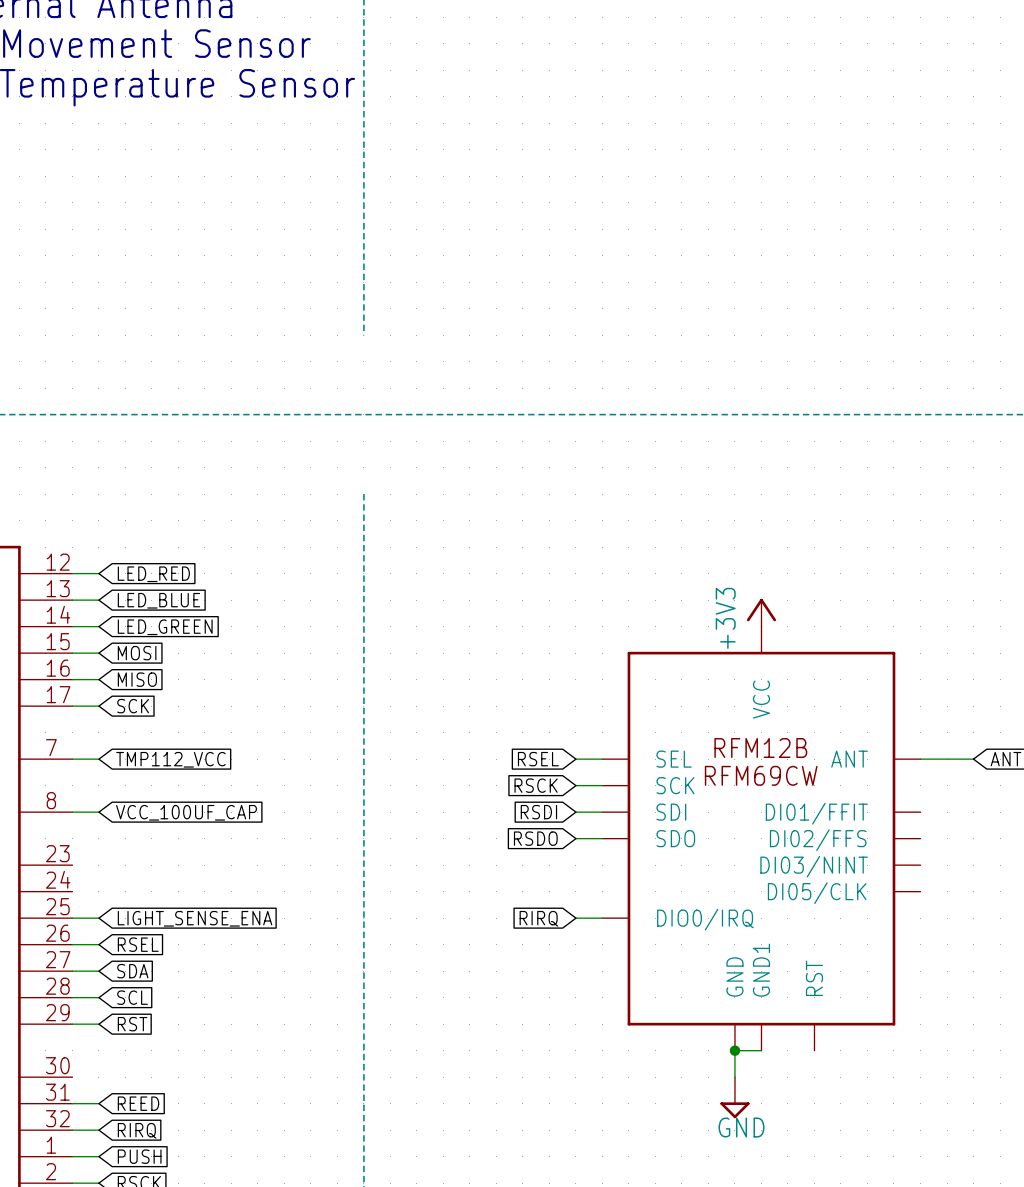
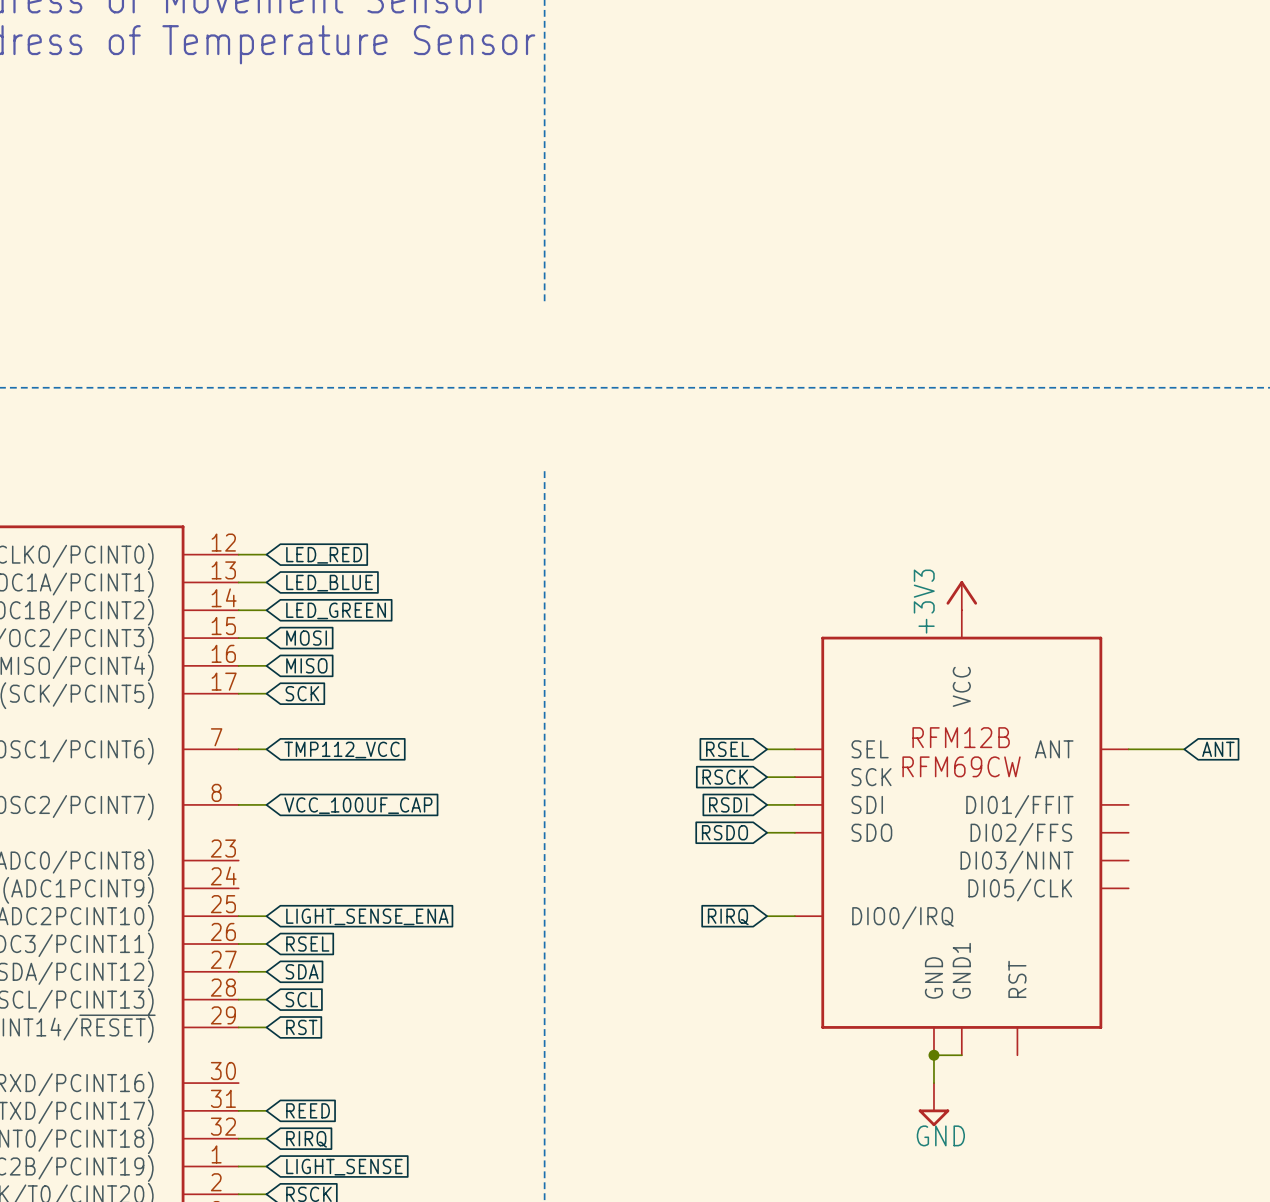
global label: PUSH (139, 1156) -> LIGHT_SENSE (344, 1167)

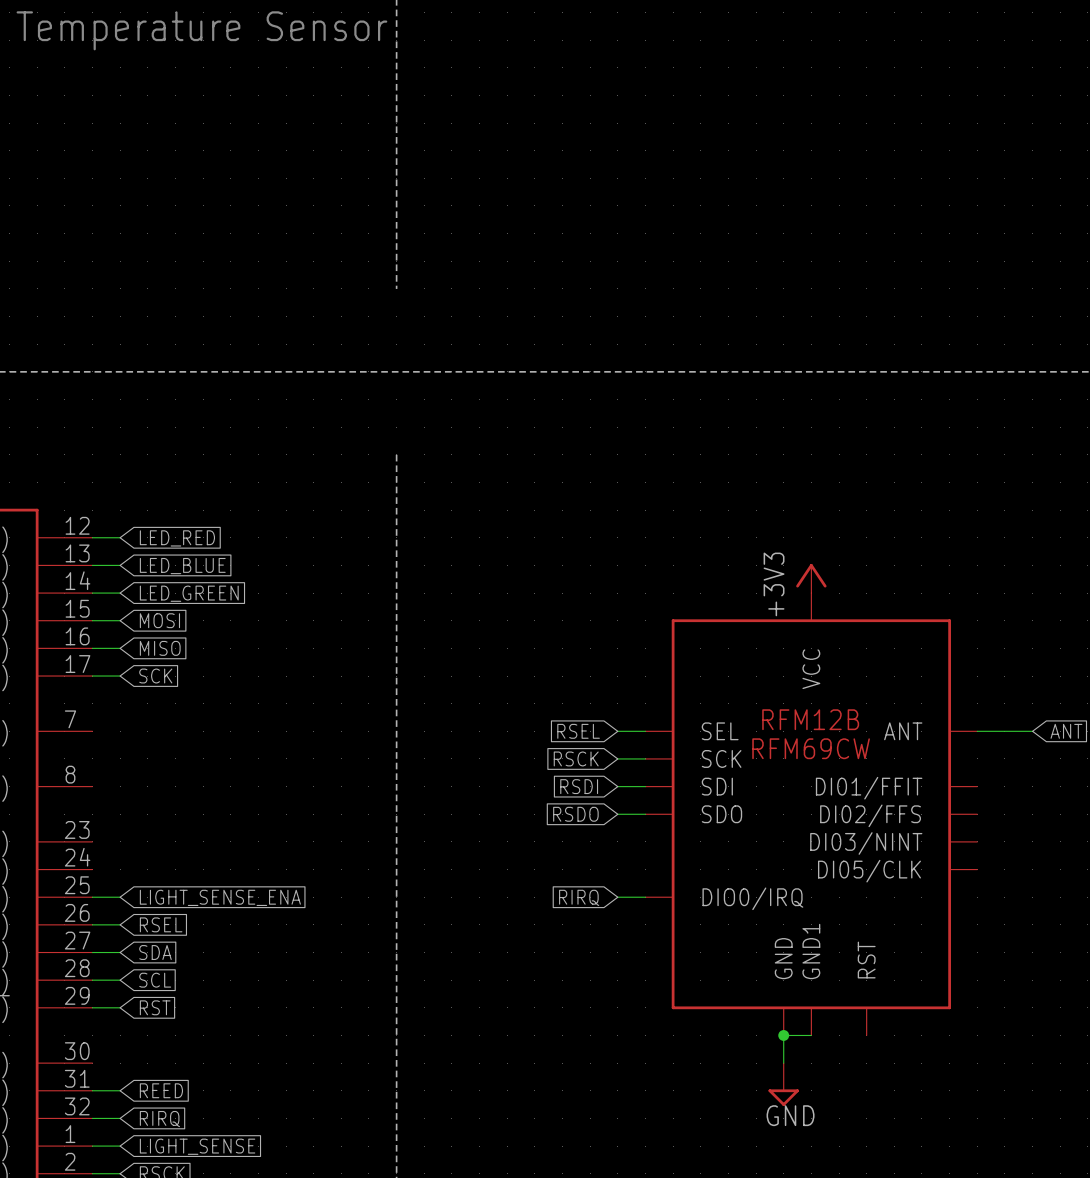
wire: (238, 749) (266, 749) -> none
global label: TMP112_VCC (342, 749) -> none
wire: (238, 804) (266, 804) -> none
global label: VCC_100UF_CAP (358, 805) -> none

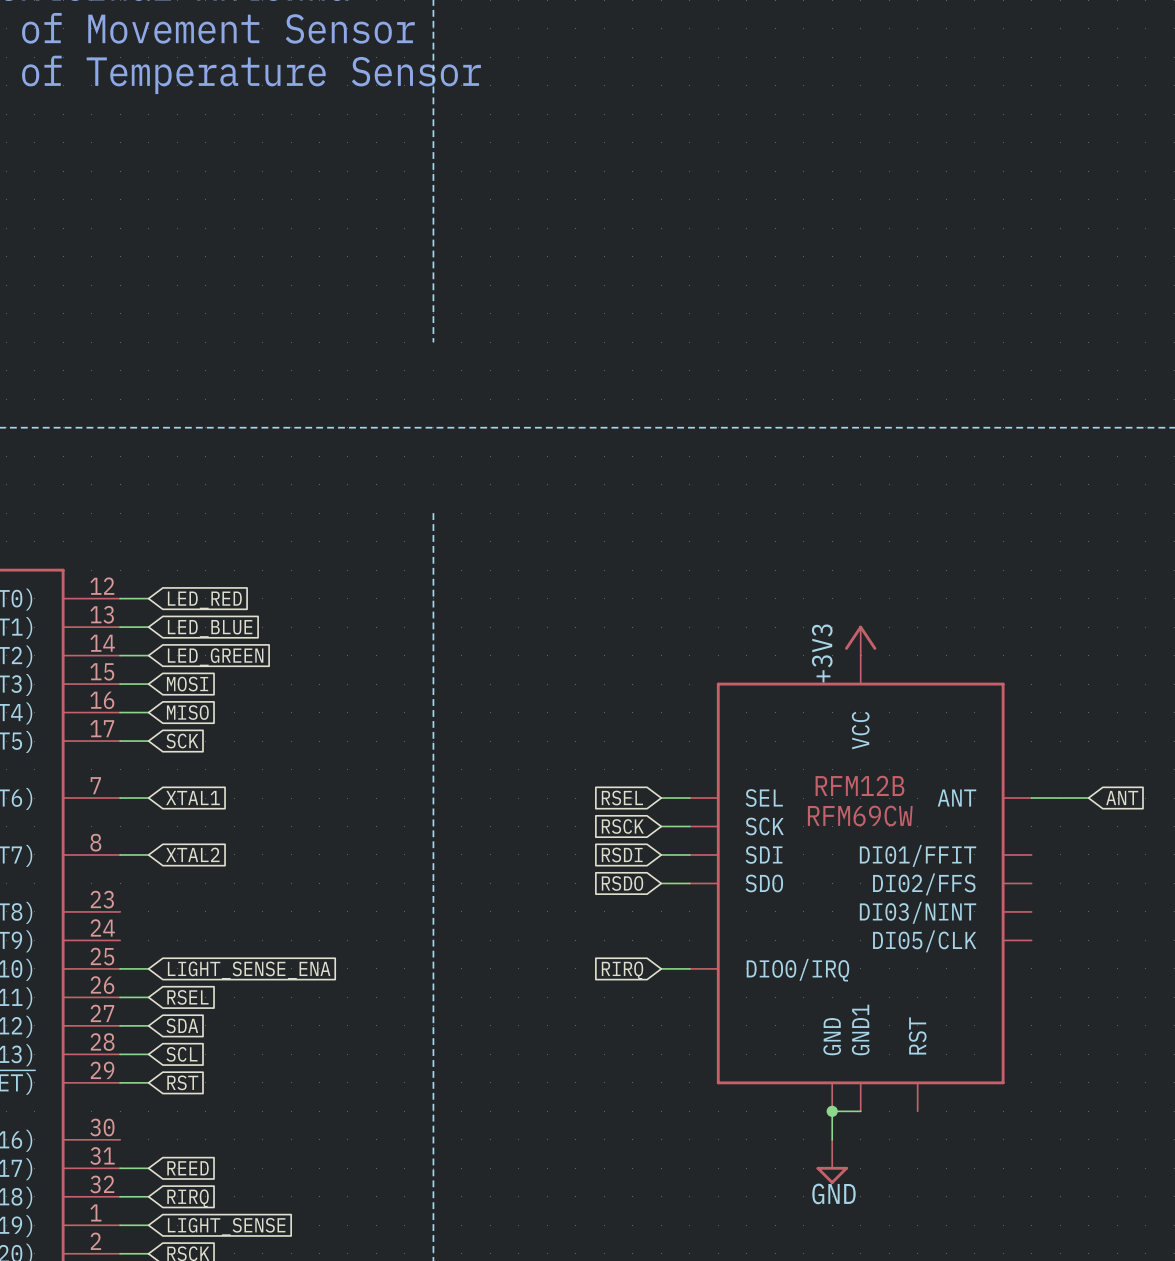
wire: none -> (120, 798) (148, 798)
global label: none -> XTAL1 (193, 798)
wire: none -> (120, 854) (148, 854)
global label: none -> XTAL2 (192, 854)

